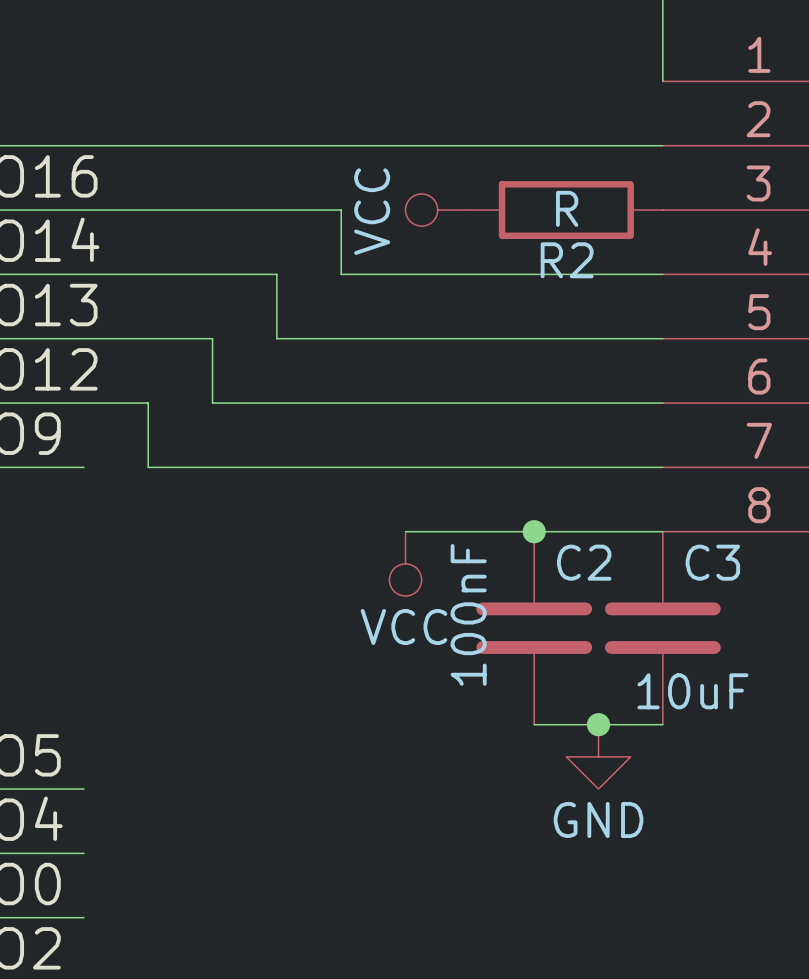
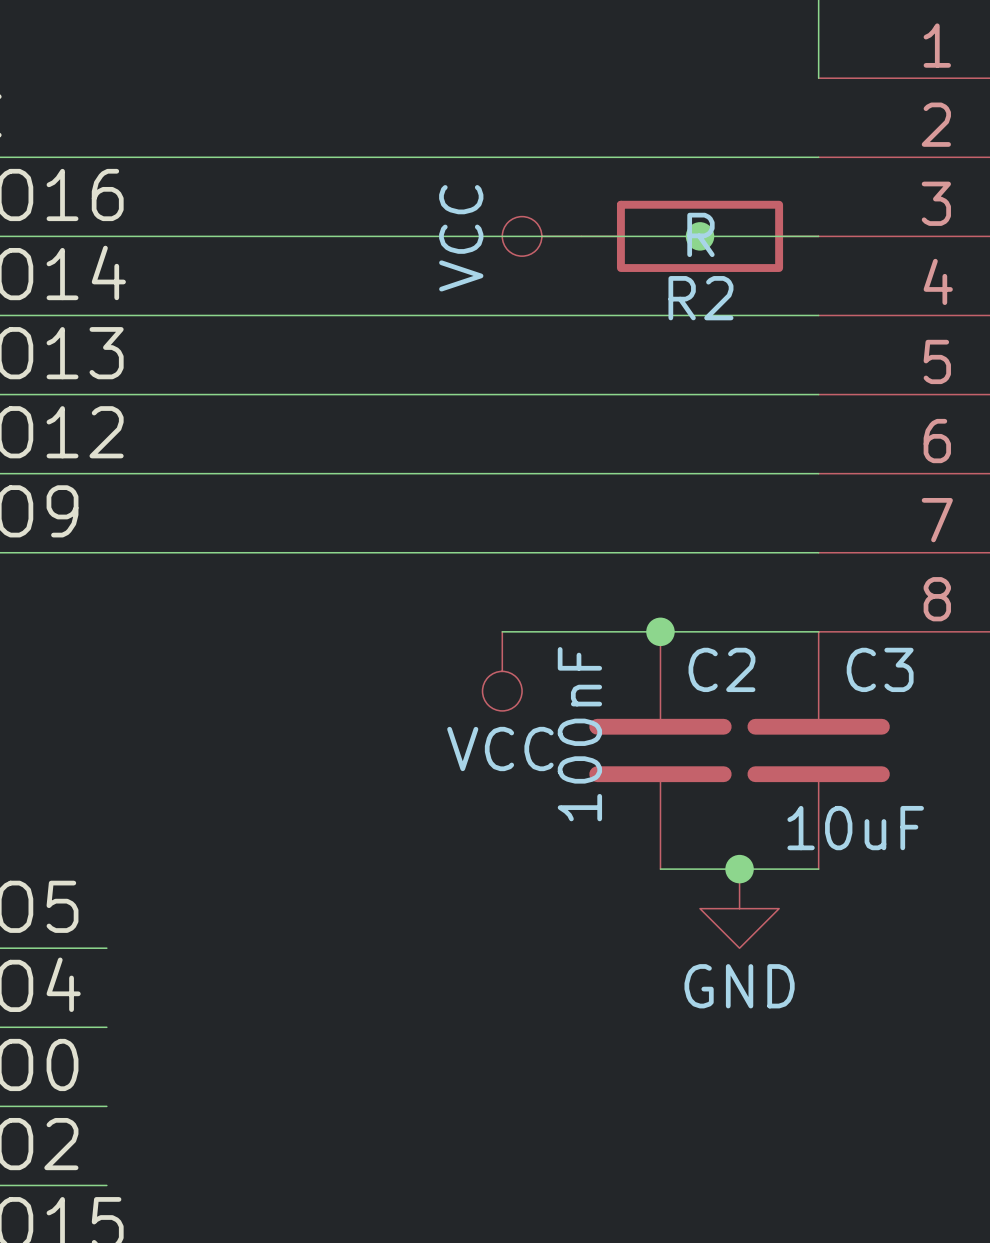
wire: (341, 210) (341, 274) -> (344, 315) (423, 315)
wire: none -> (423, 236) (818, 236)
junction: none -> (700, 236)
wire: (276, 274) (276, 338) -> (265, 394) (344, 394)
wire: (212, 338) (212, 403) -> (185, 473) (265, 473)
wire: (148, 403) (148, 467) -> (106, 552) (185, 552)

